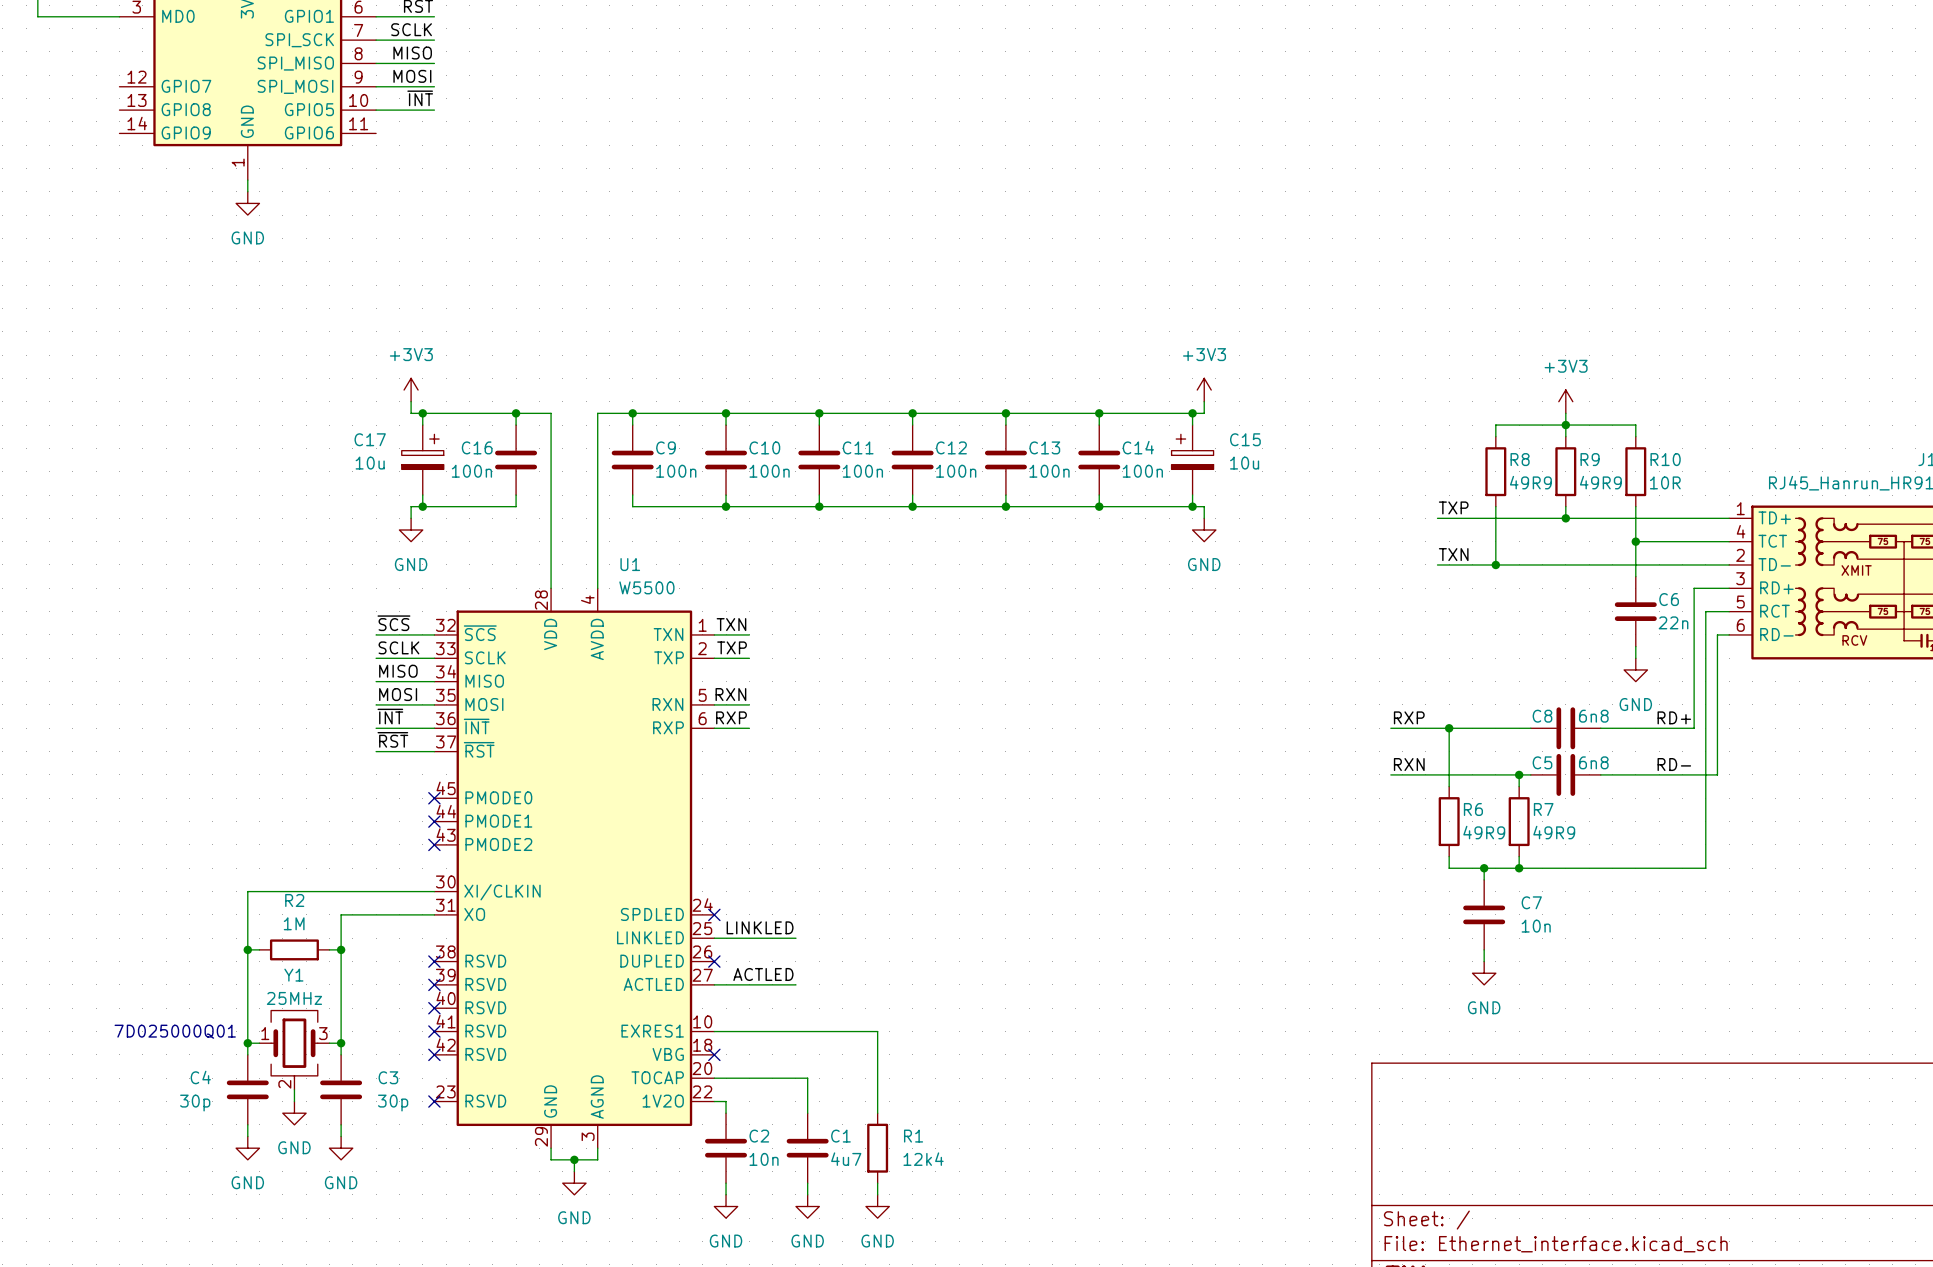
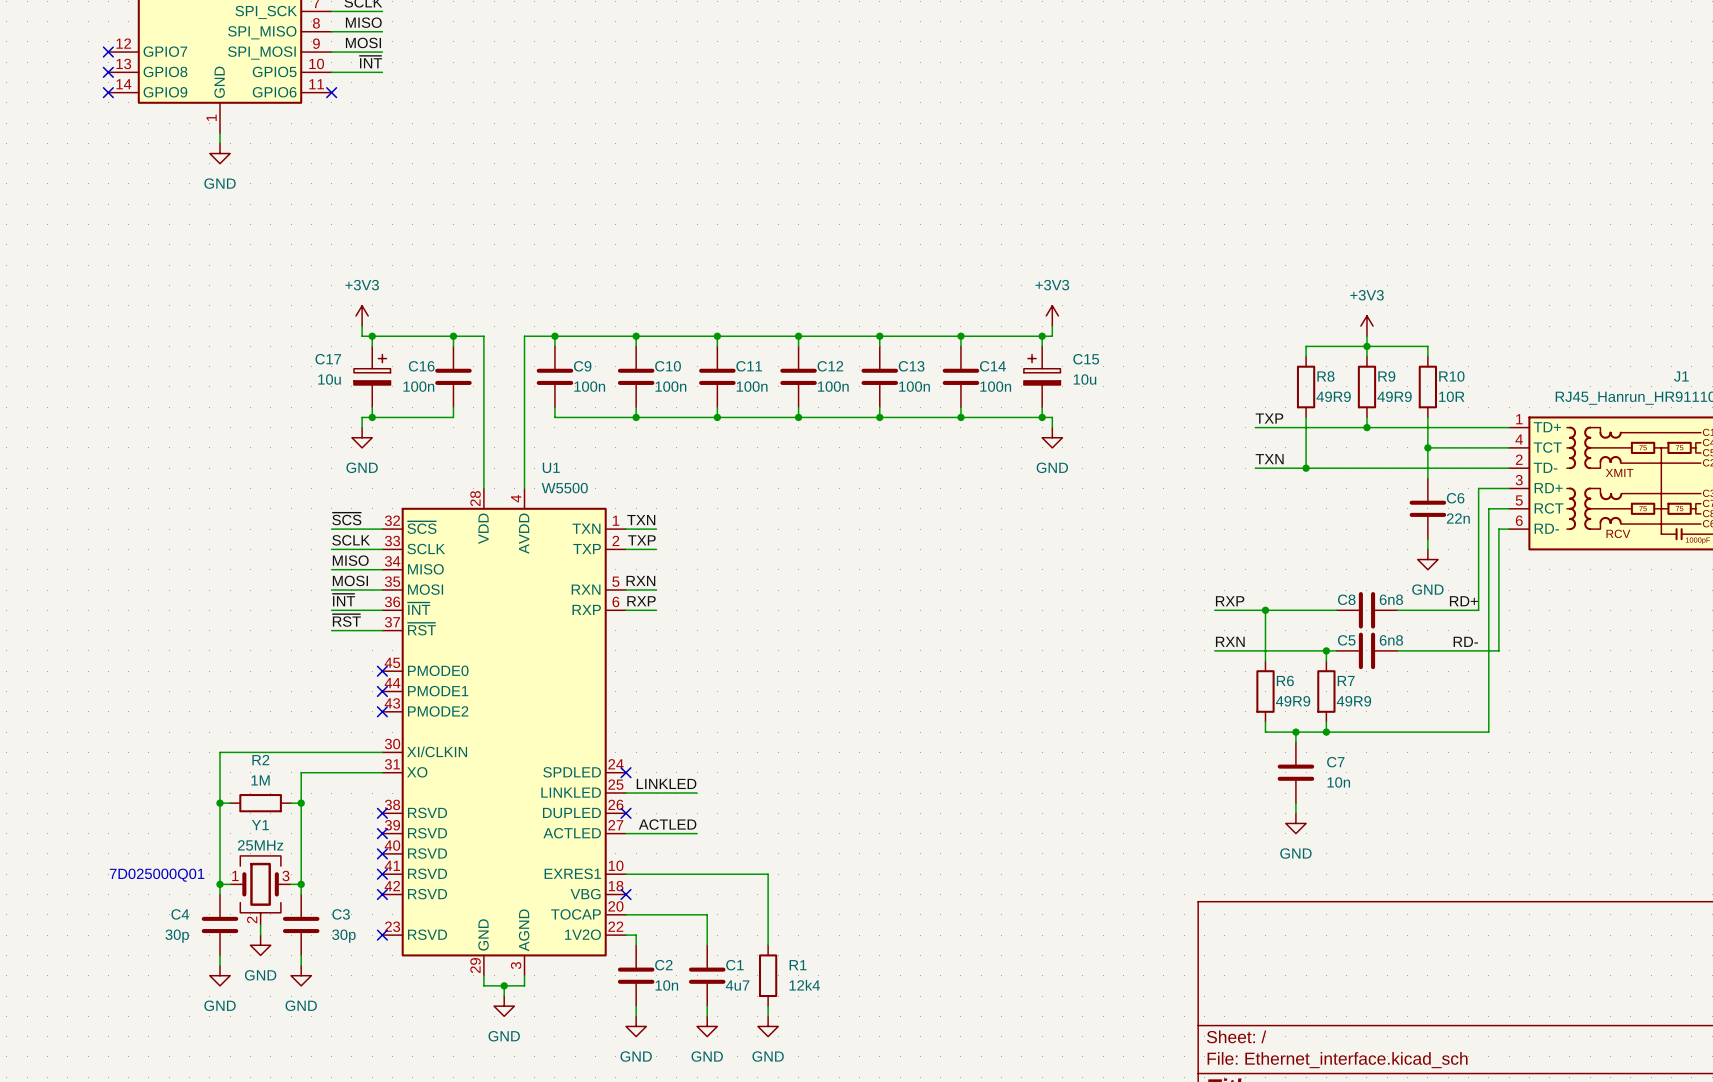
no-connect mark: none -> (108, 52)
no-connect mark: none -> (108, 72)
no-connect mark: none -> (108, 92)
no-connect mark: none -> (331, 92)

